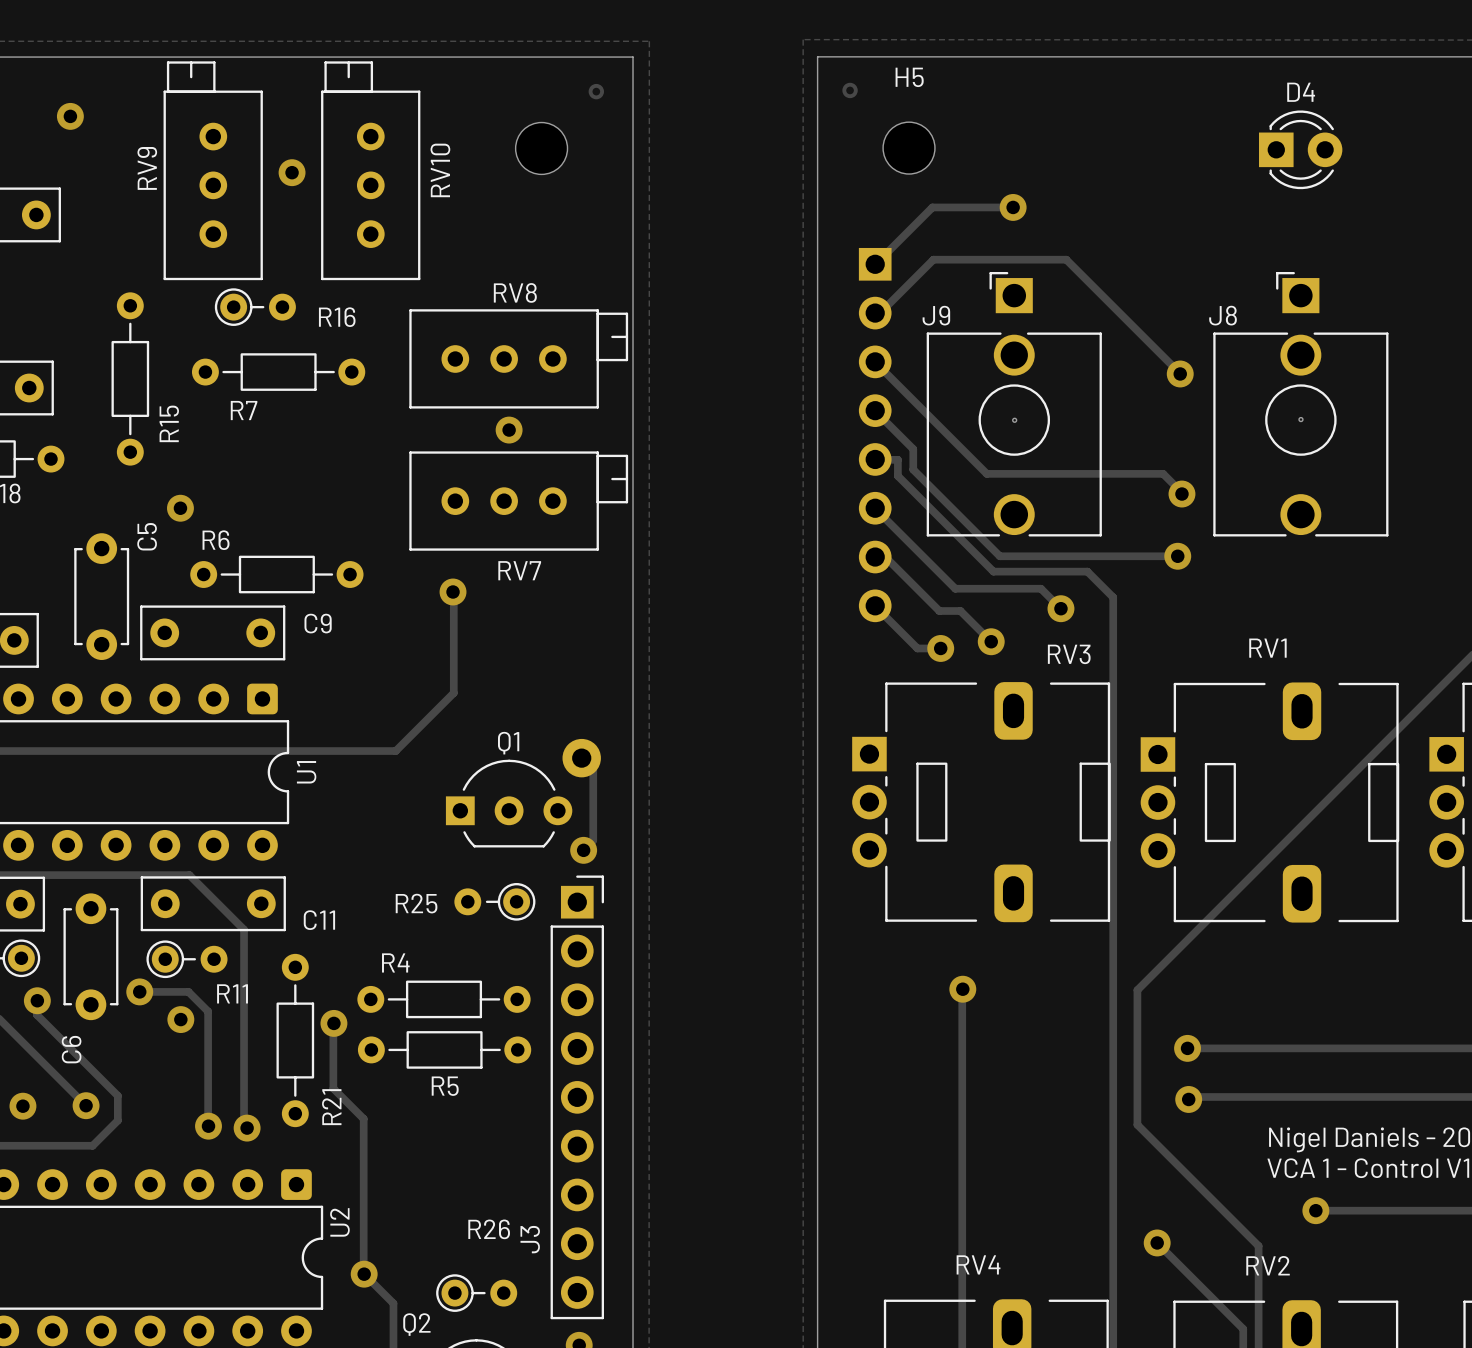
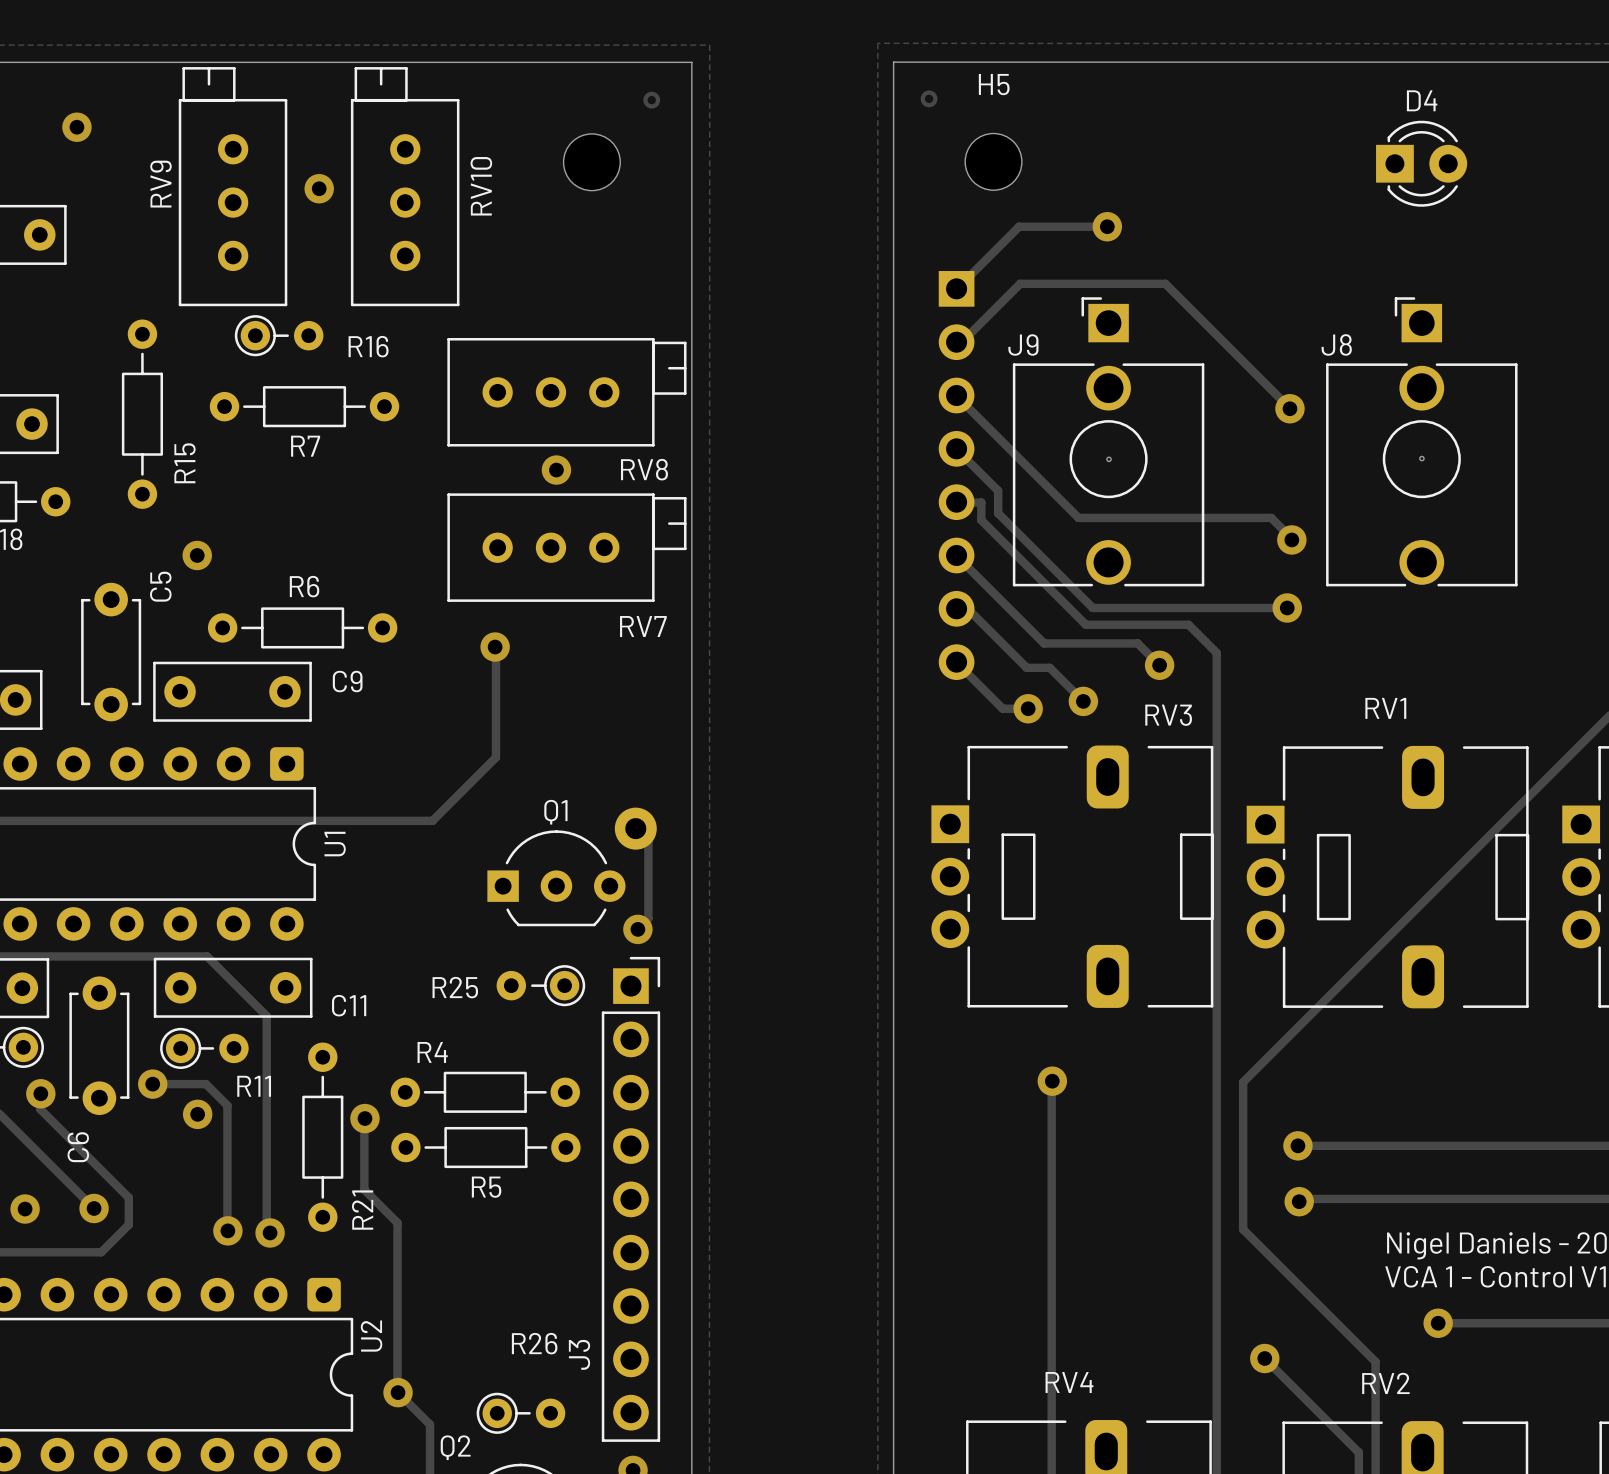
RV8 name position: RV8 (515, 292) -> RV8 (644, 469)
R7 name position: R7 (244, 410) -> R7 (305, 446)
R6 name position: R6 (216, 540) -> R6 (304, 586)
RV7 name position: RV7 (519, 570) -> RV7 (643, 626)

